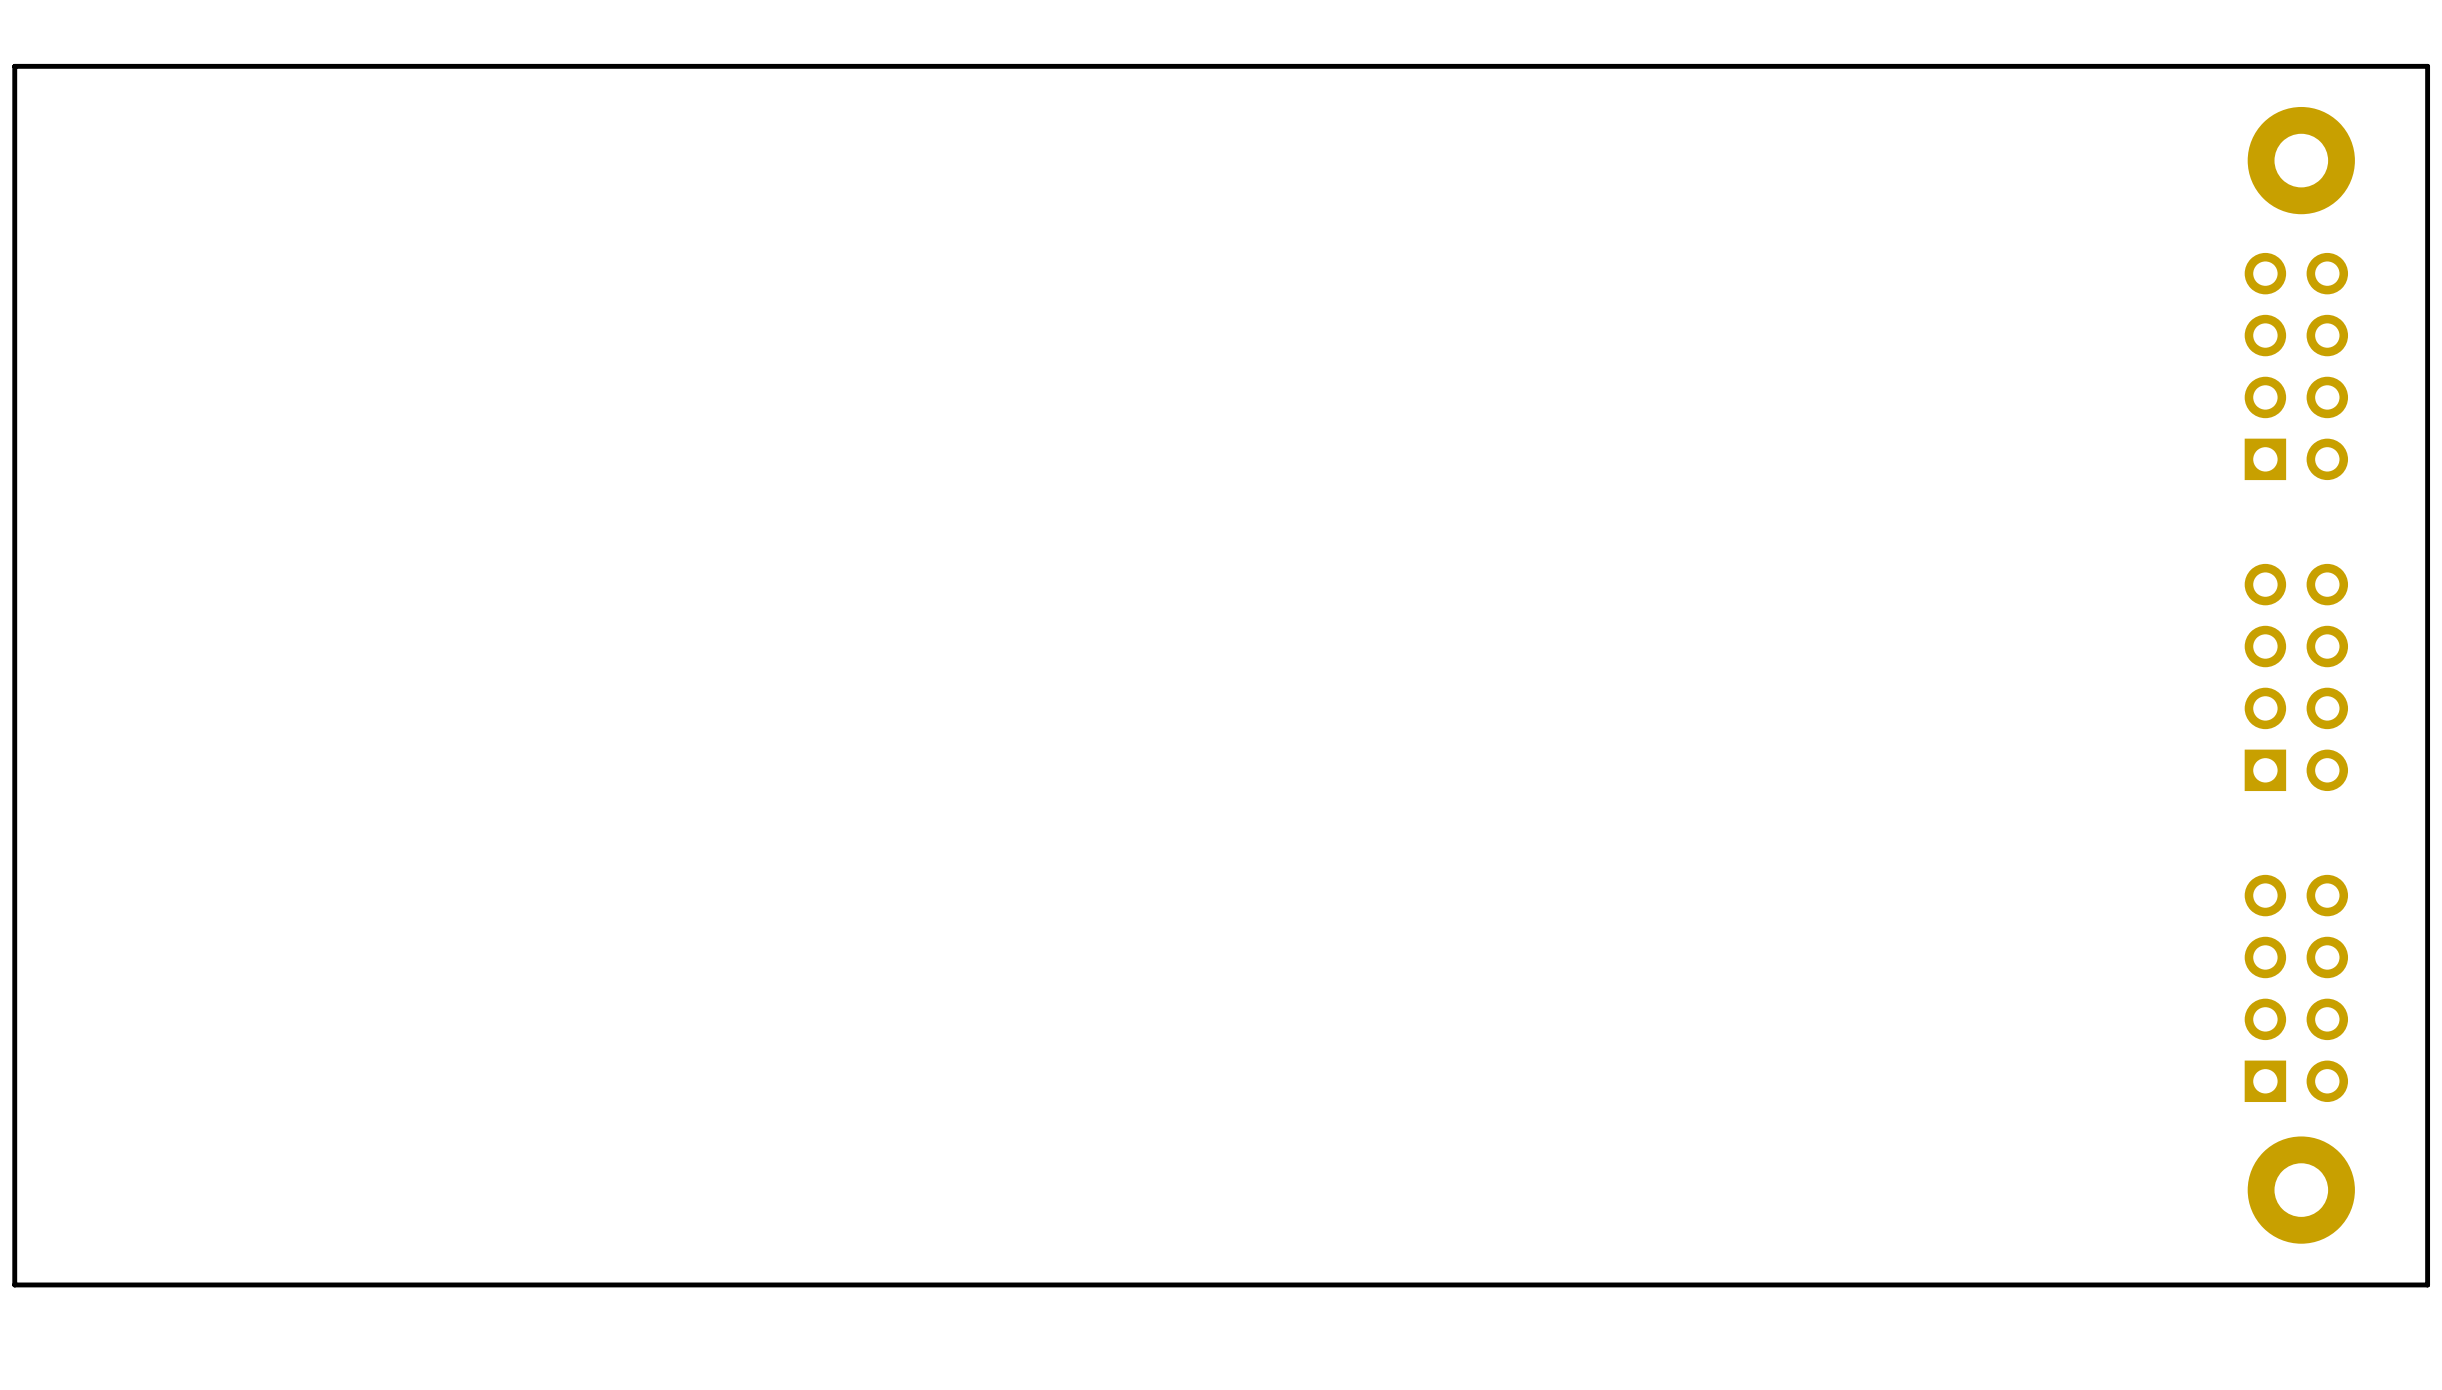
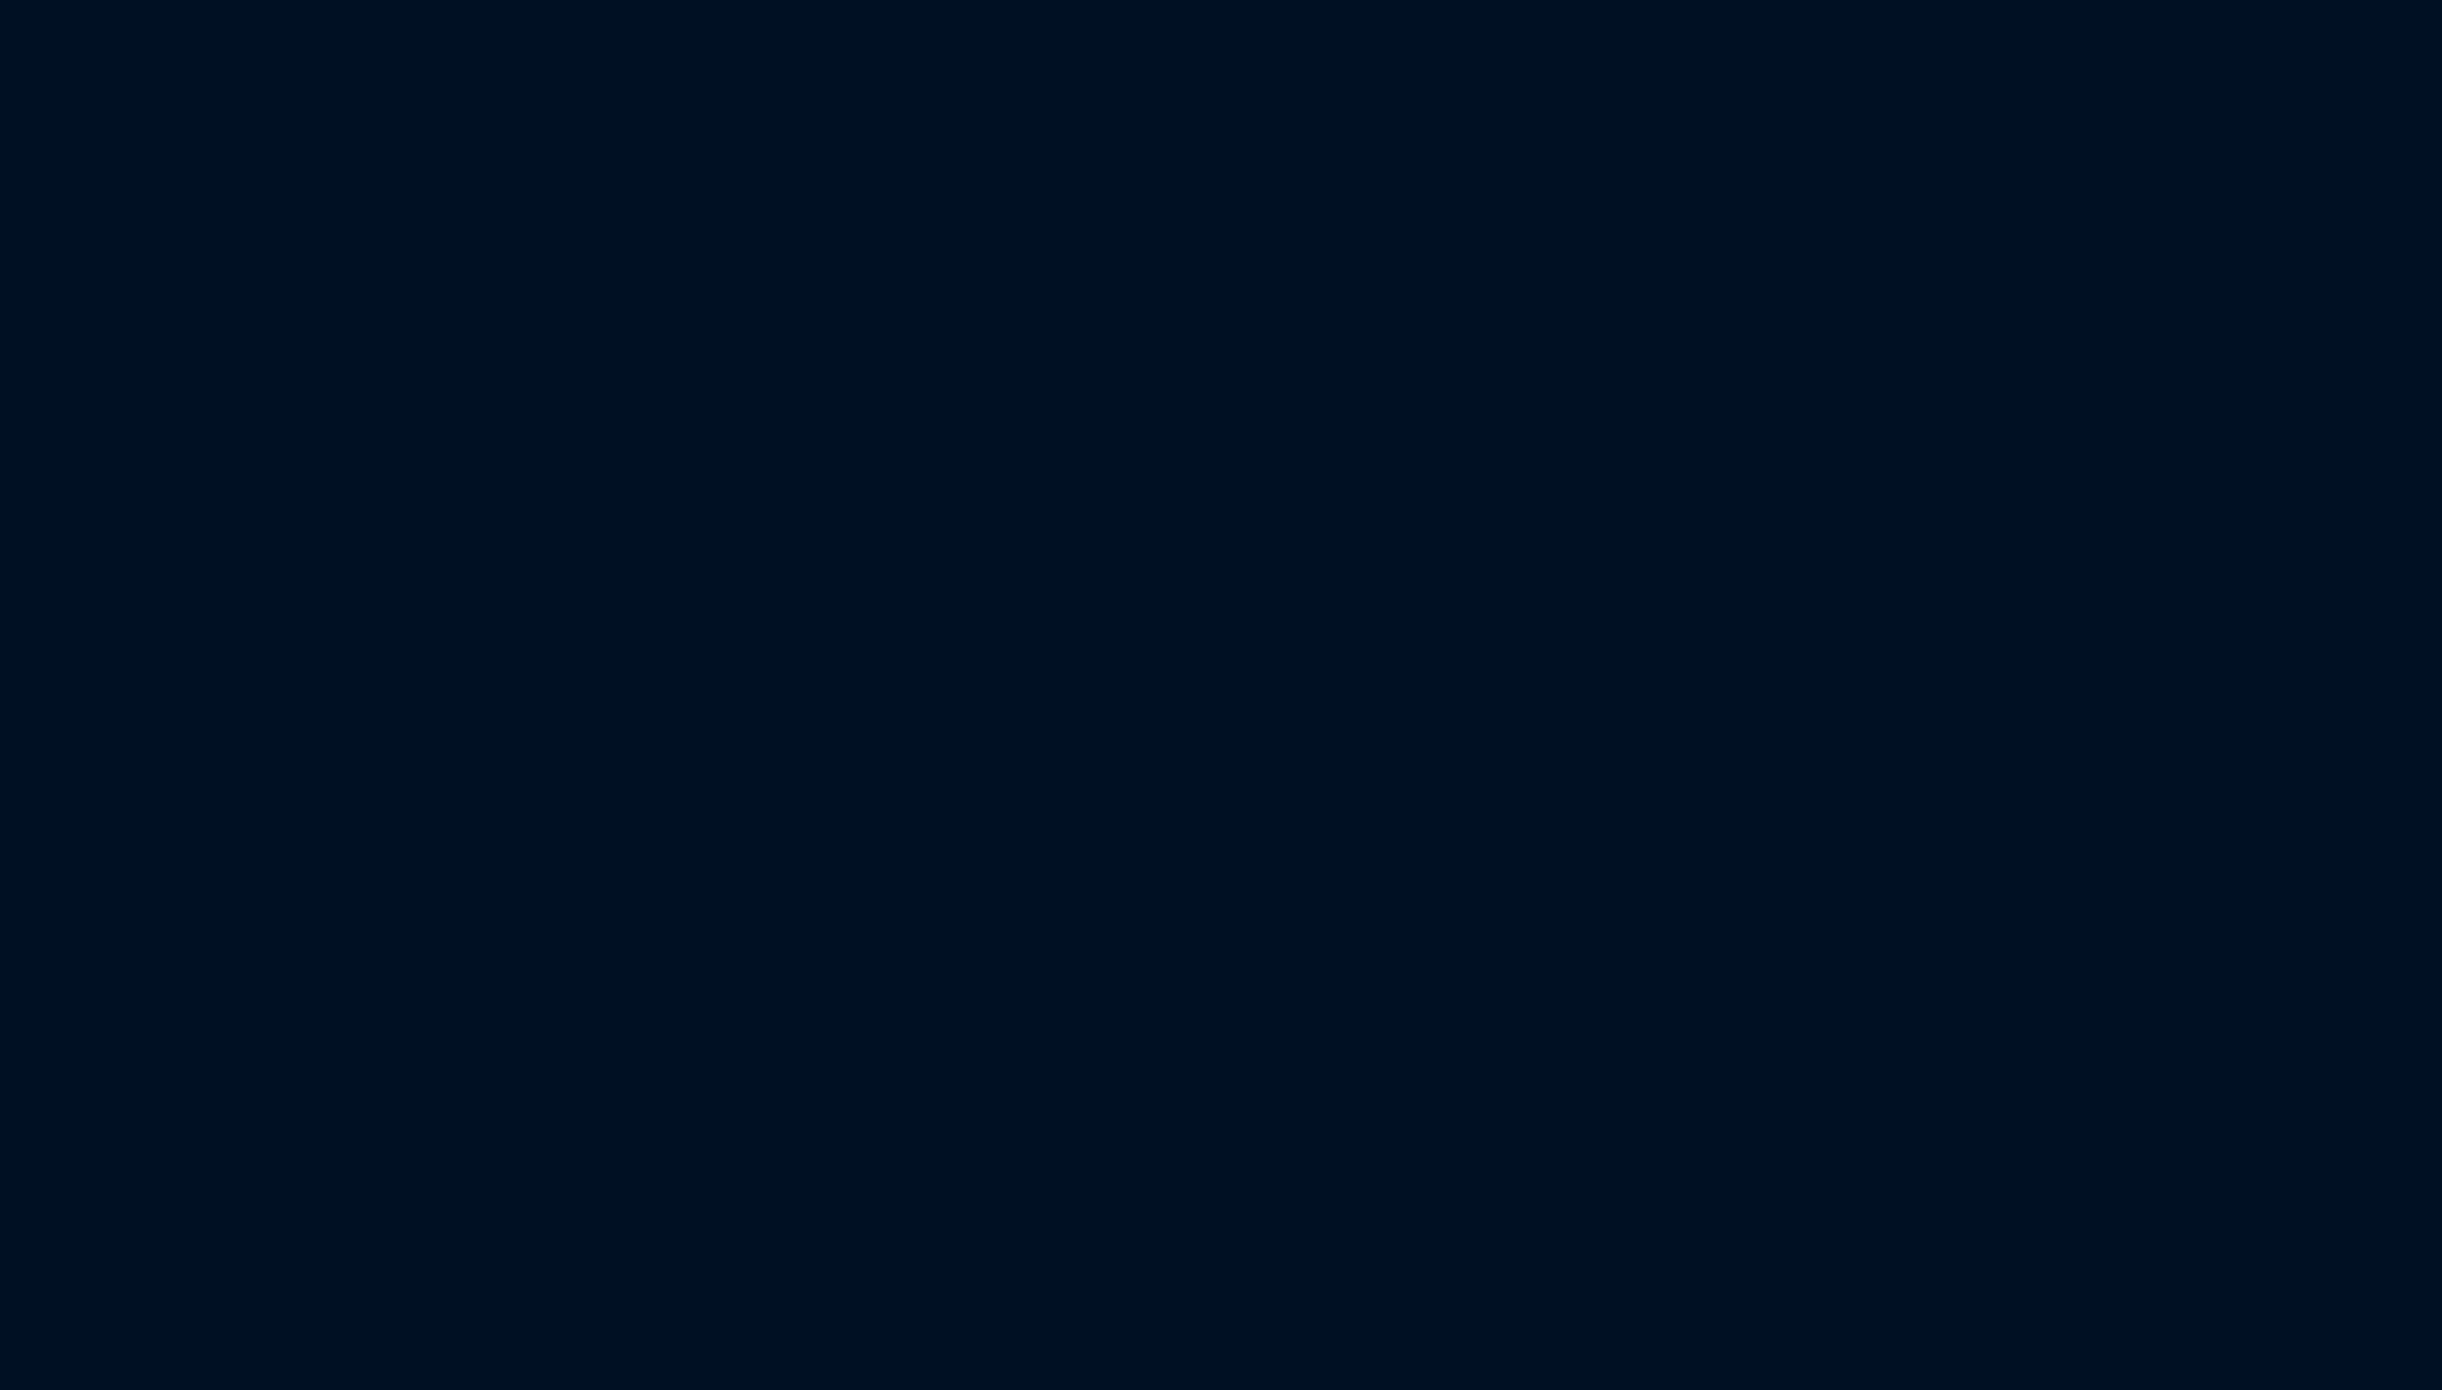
board edge: (2427, 66) (14, 66) (14, 1284) (2427, 1284) (2427, 66) -> none
part: (2301, 160) -> none
part: (2296, 366) -> none
part: (2296, 677) -> none
part: (2296, 988) -> none
part: (2301, 1190) -> none

